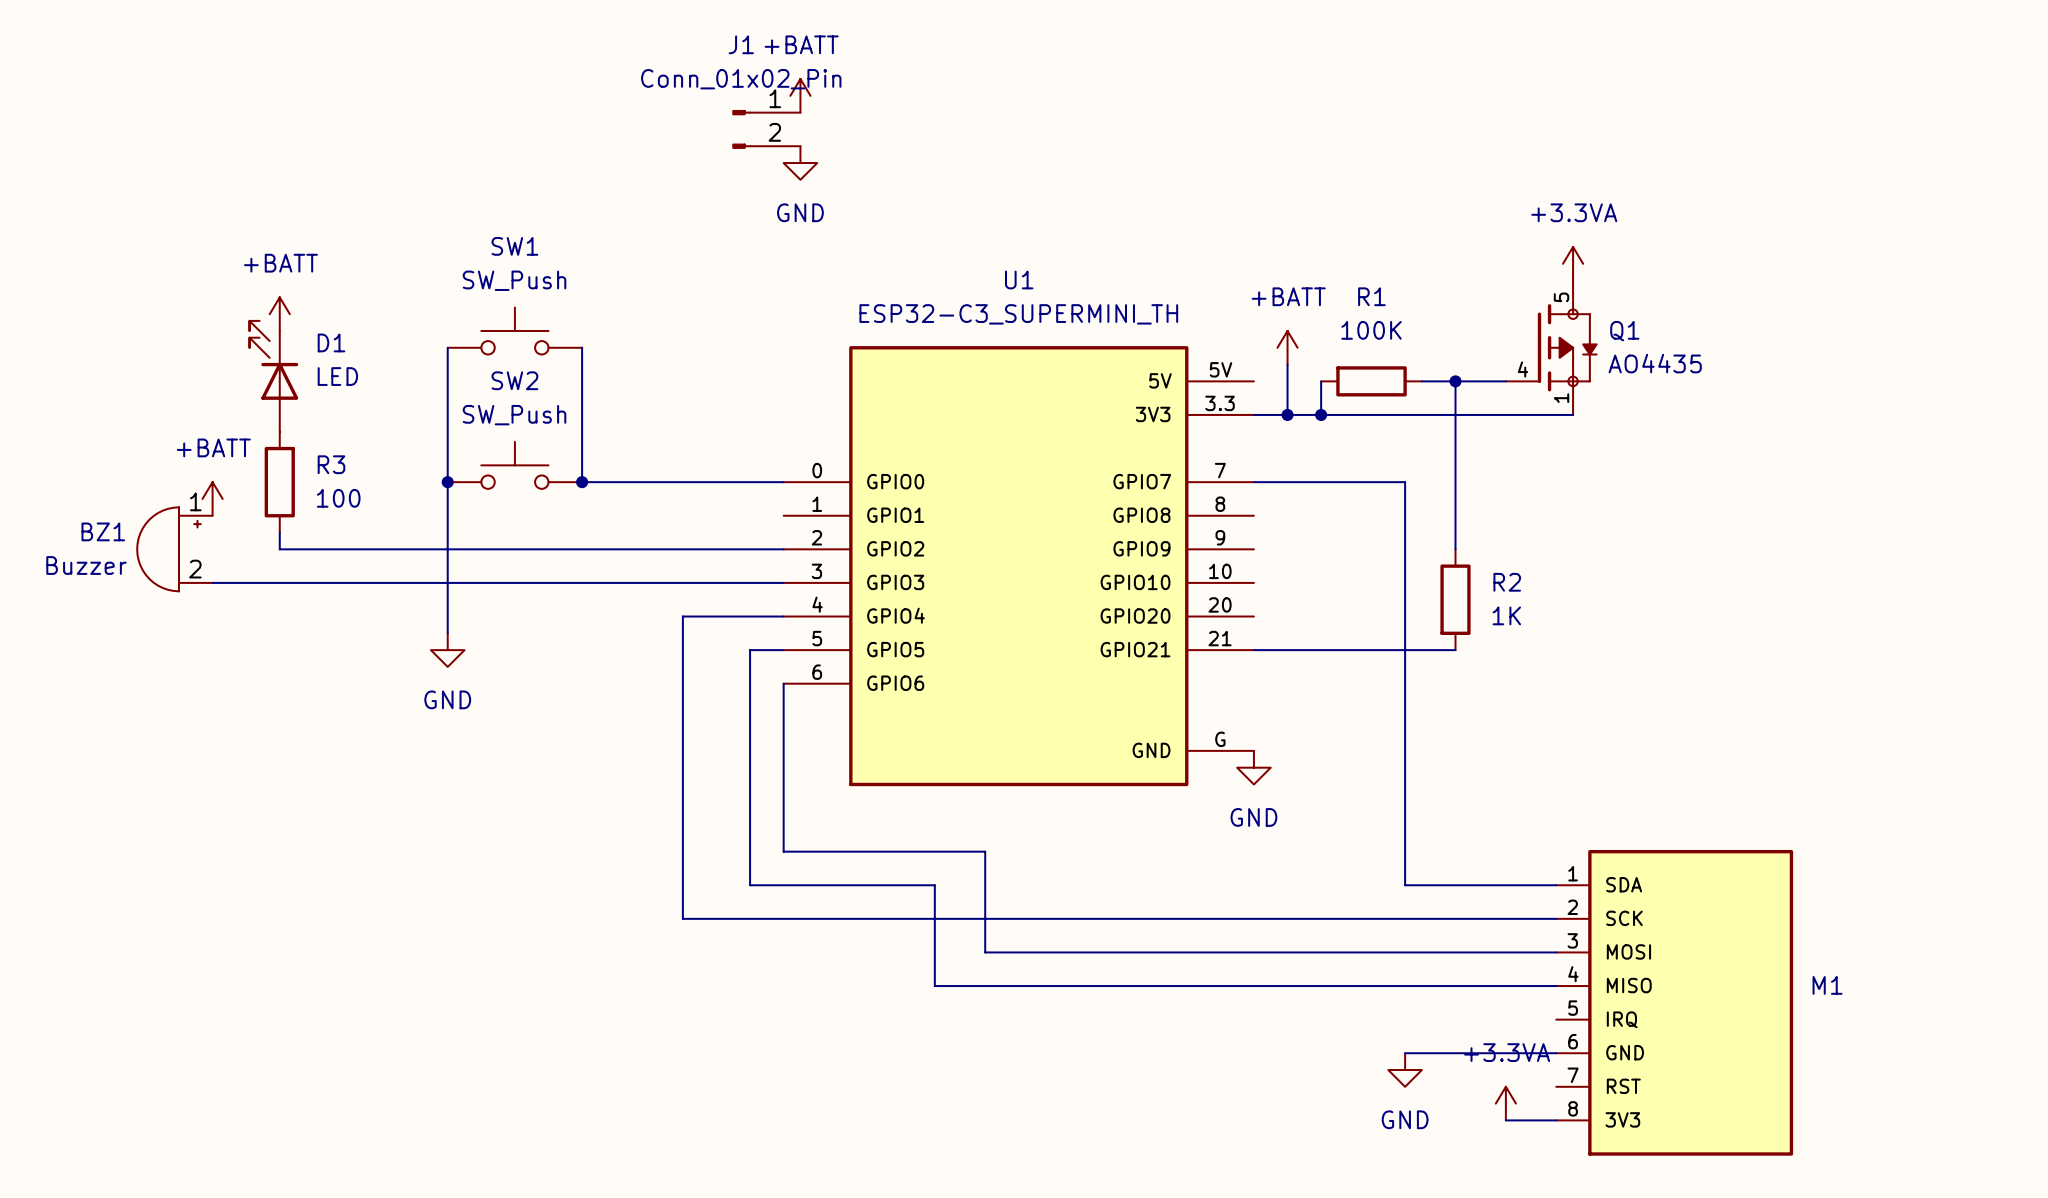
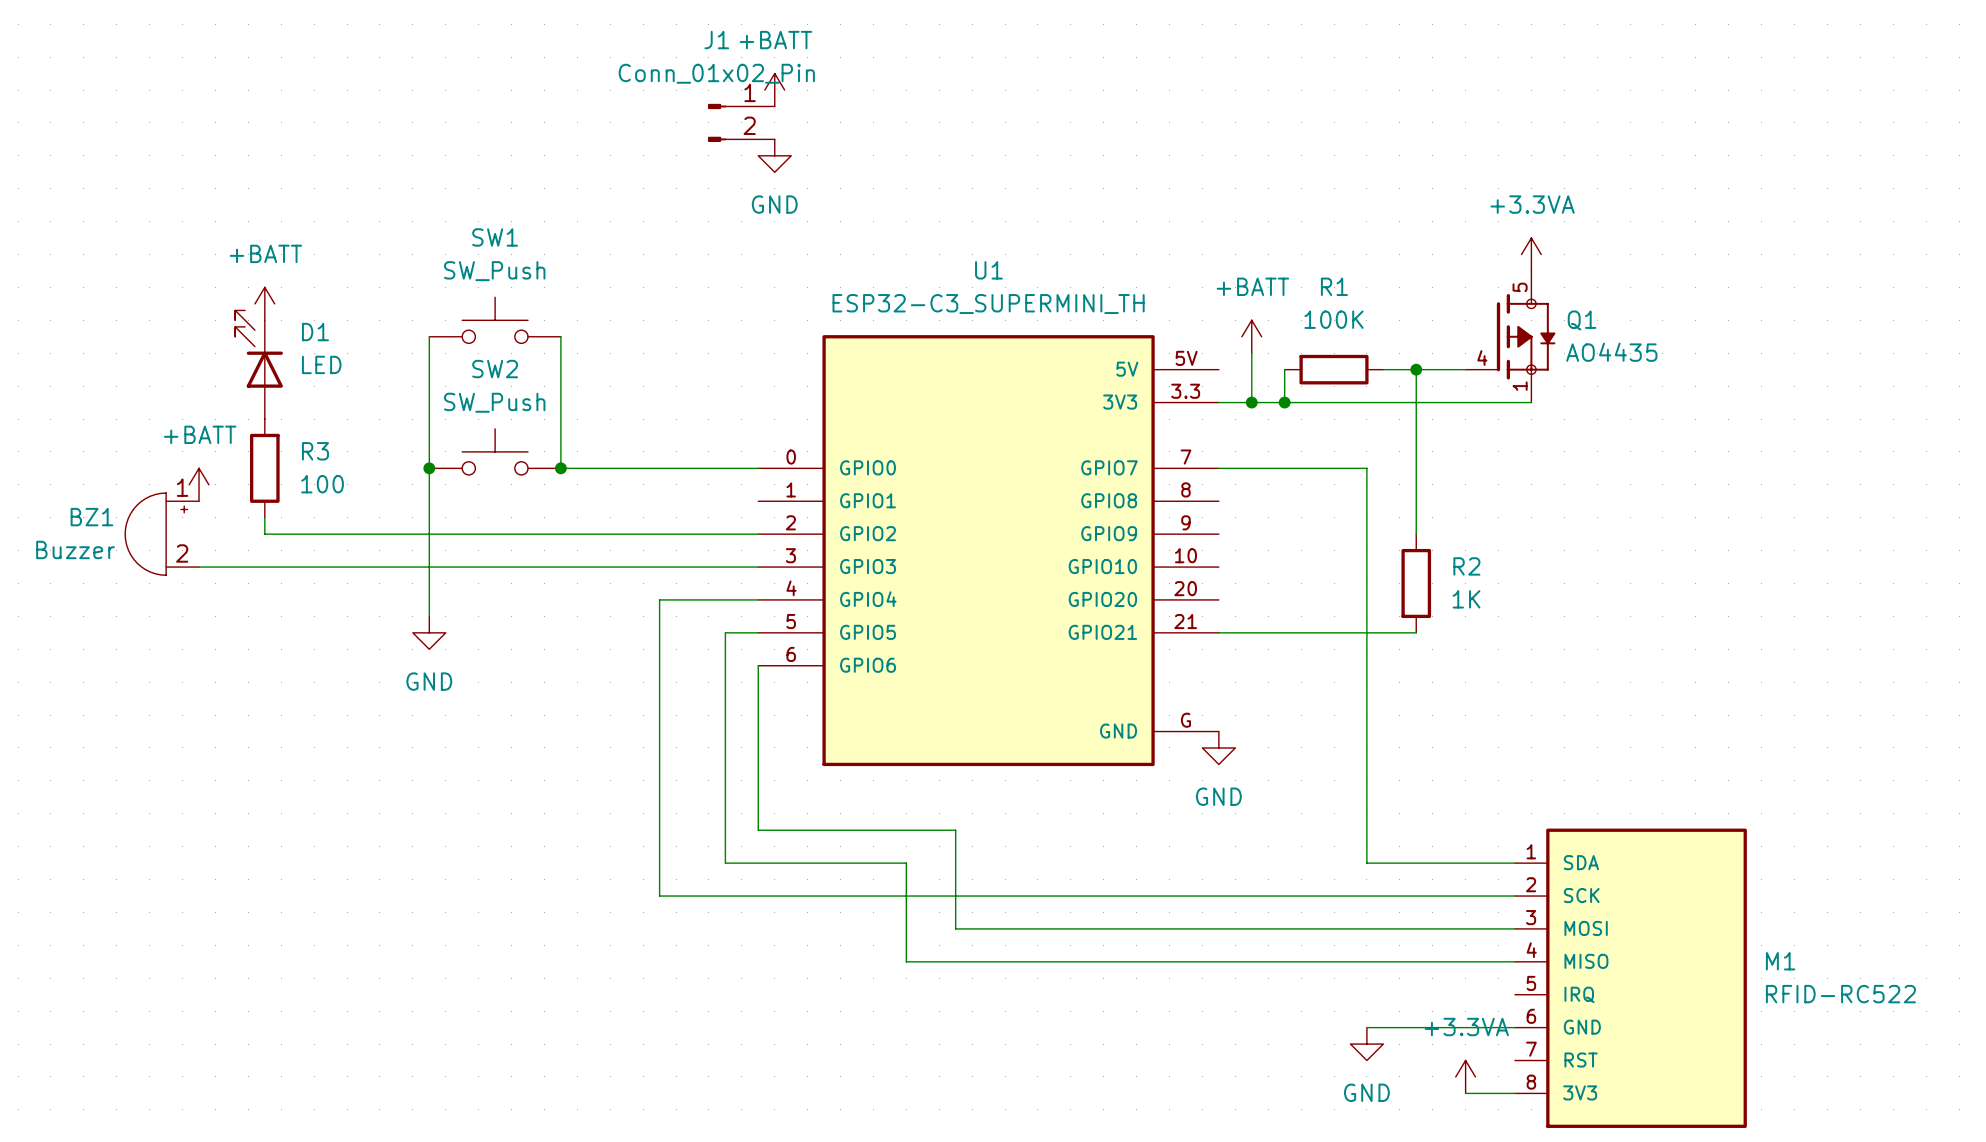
M1 value: none -> RFID-RC522 (1840, 994)

